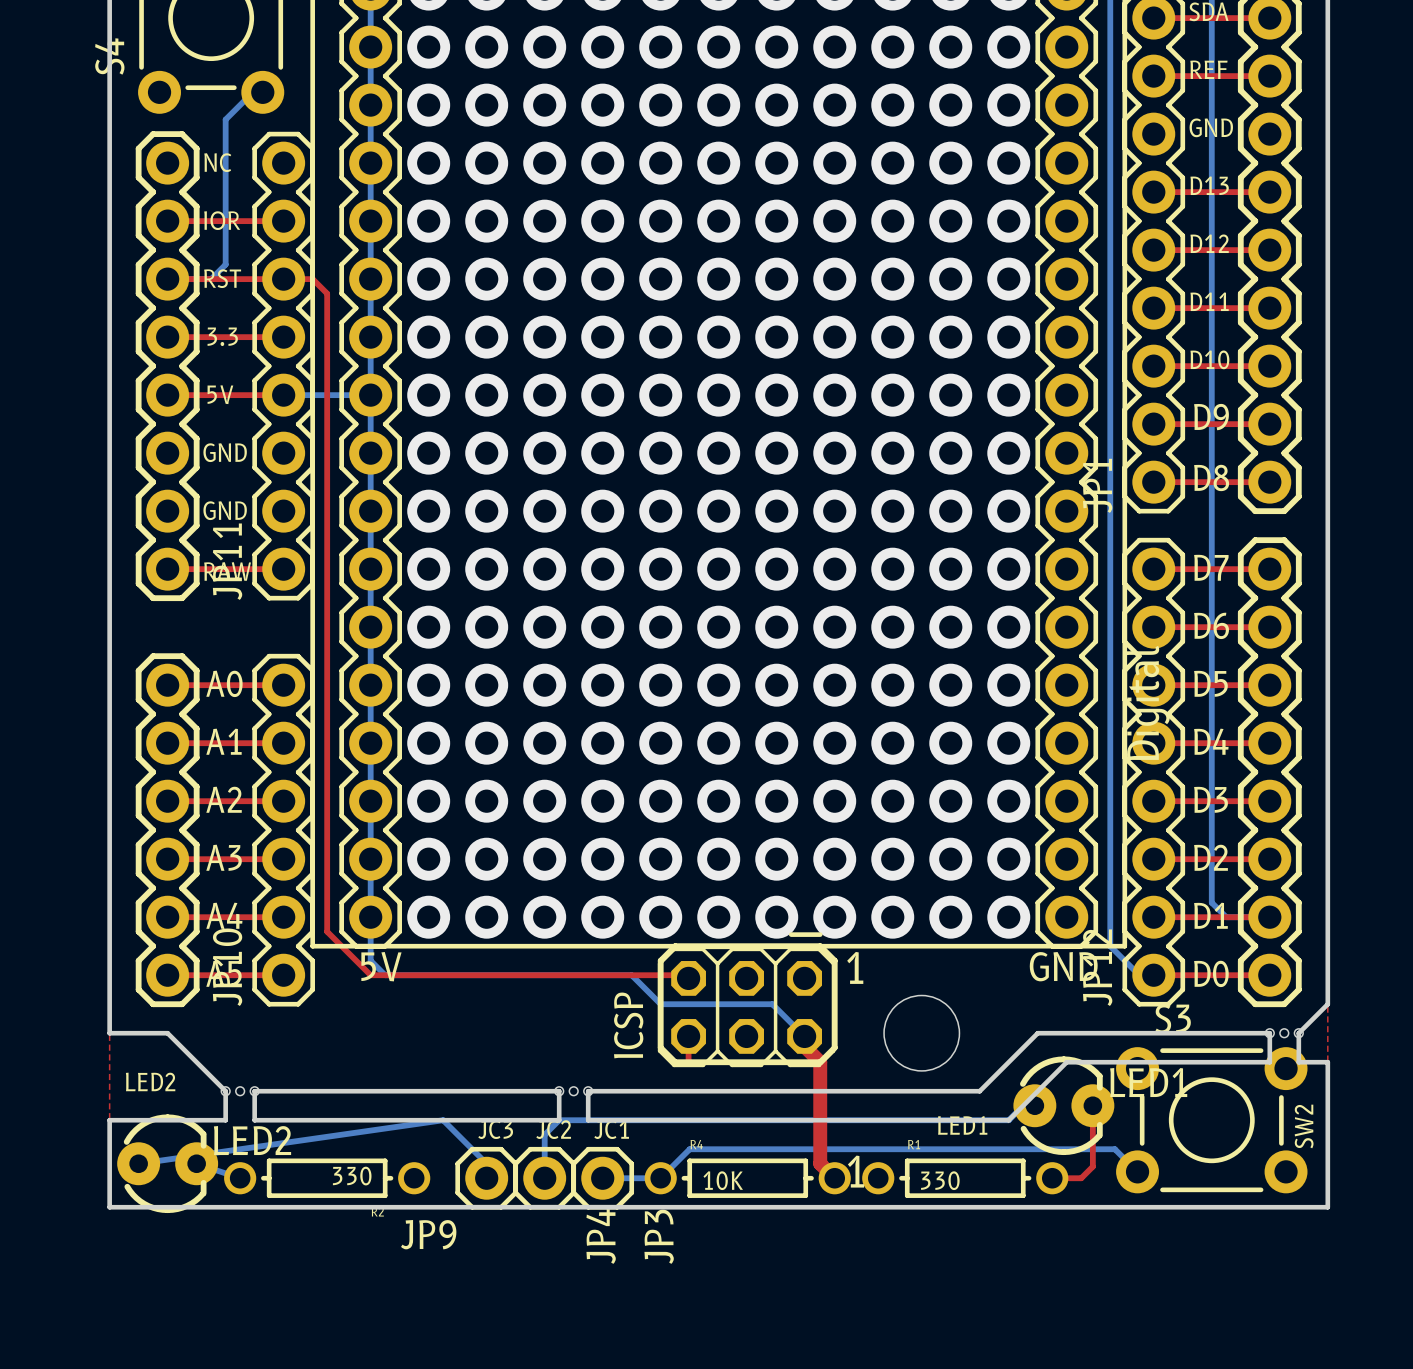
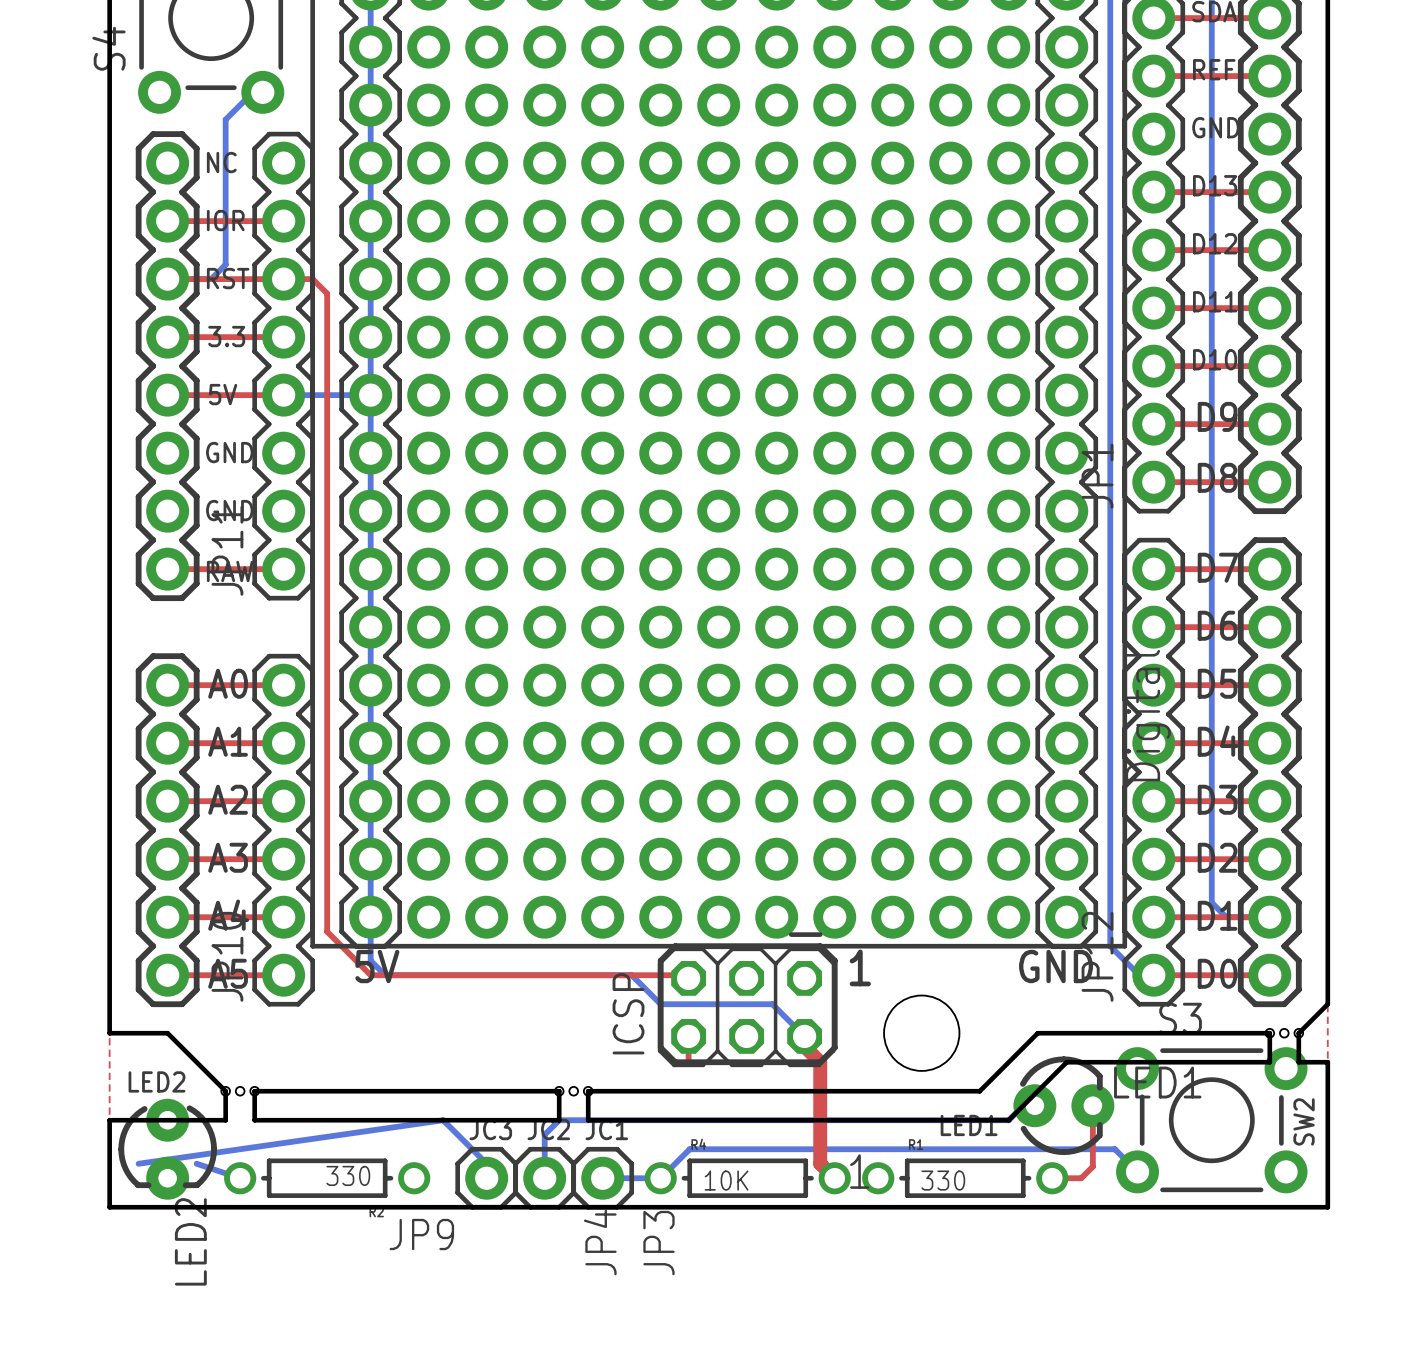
LED2 rotation: 0° (167, 1163) -> 90° clockwise (167, 1149)

